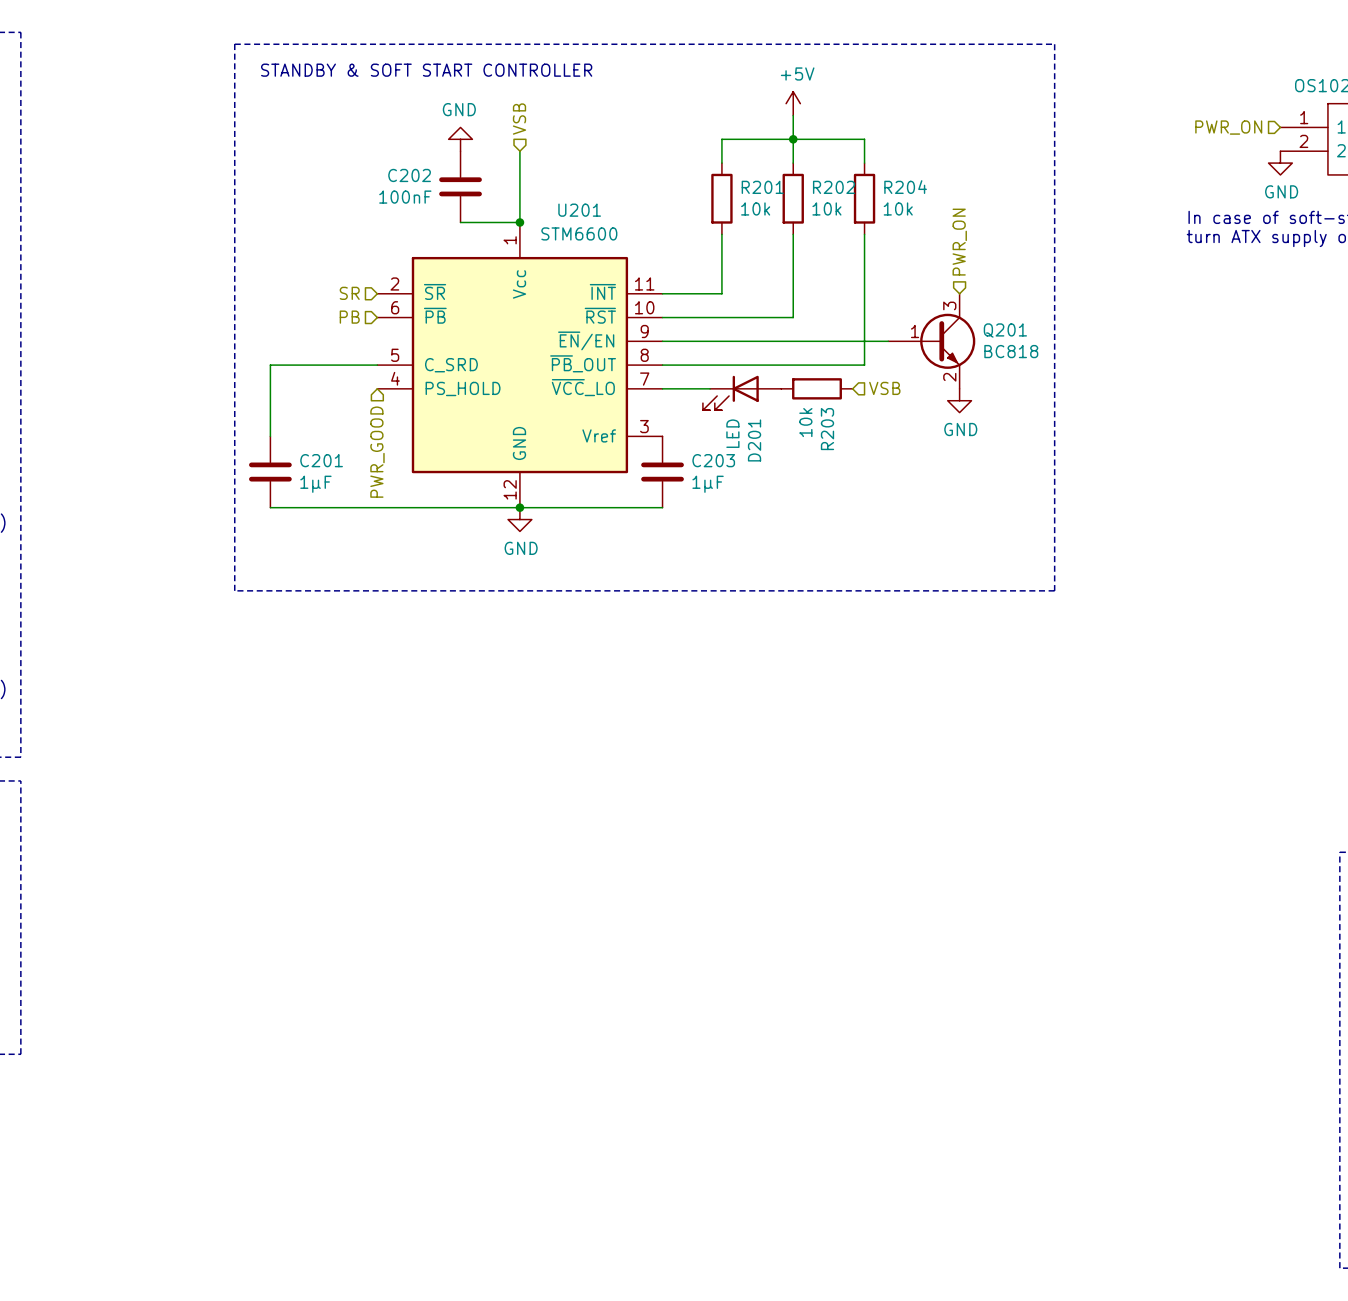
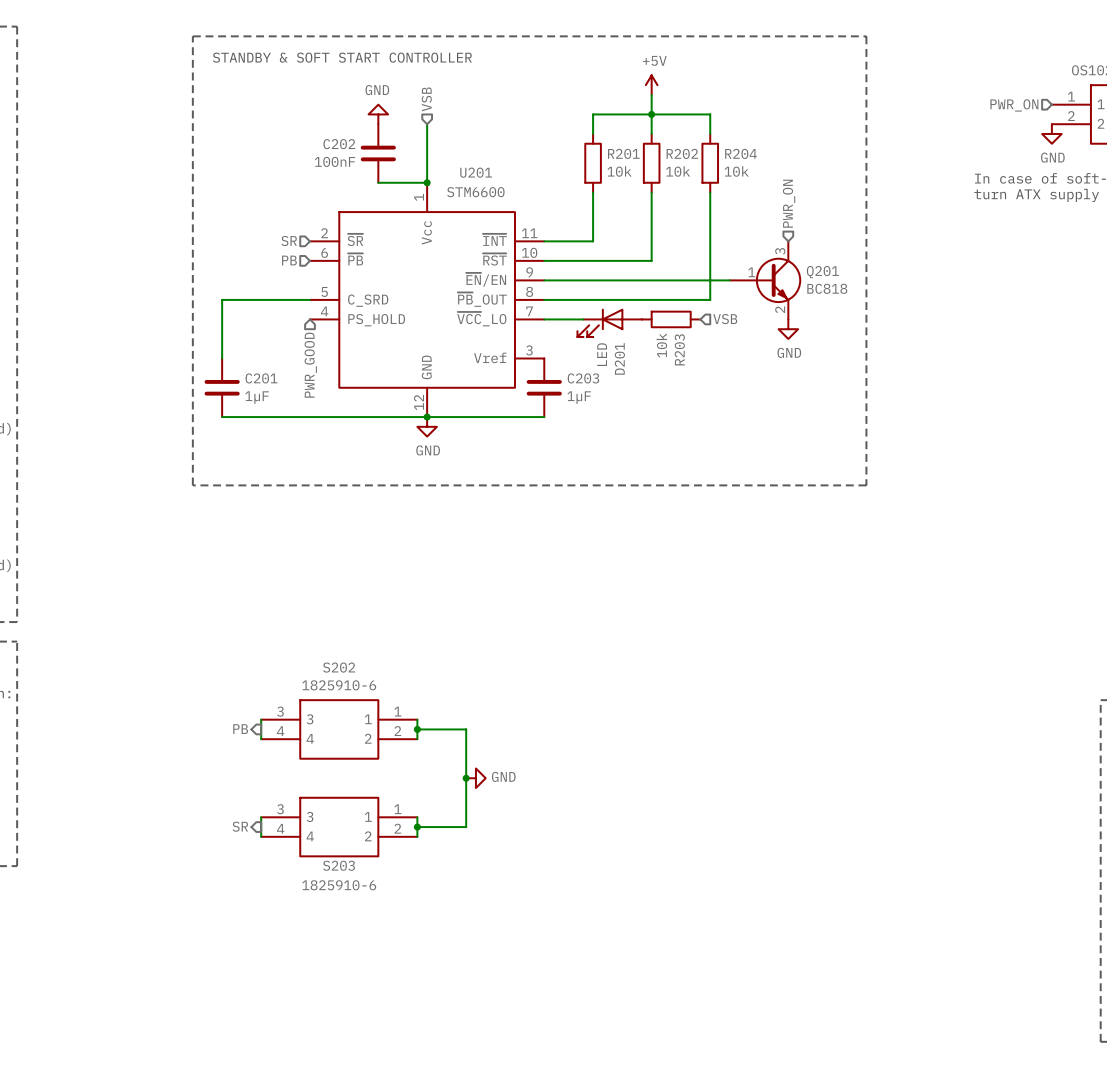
wire: none -> (261, 719) (261, 739)
wire: none -> (417, 719) (417, 739)
hierarchical label: none -> PB (240, 729)
S202: none -> 1825910-6 (339, 729)
wire: none -> (417, 729) (466, 729) (466, 827) (417, 827)
junction: none -> (417, 729)
junction: none -> (466, 778)
power symbol: none -> GND (475, 778)
wire: none -> (261, 817) (261, 836)
wire: none -> (417, 817) (417, 836)
hierarchical label: none -> SR (240, 826)
S203: none -> 1825910-6 (339, 827)
junction: none -> (417, 827)

